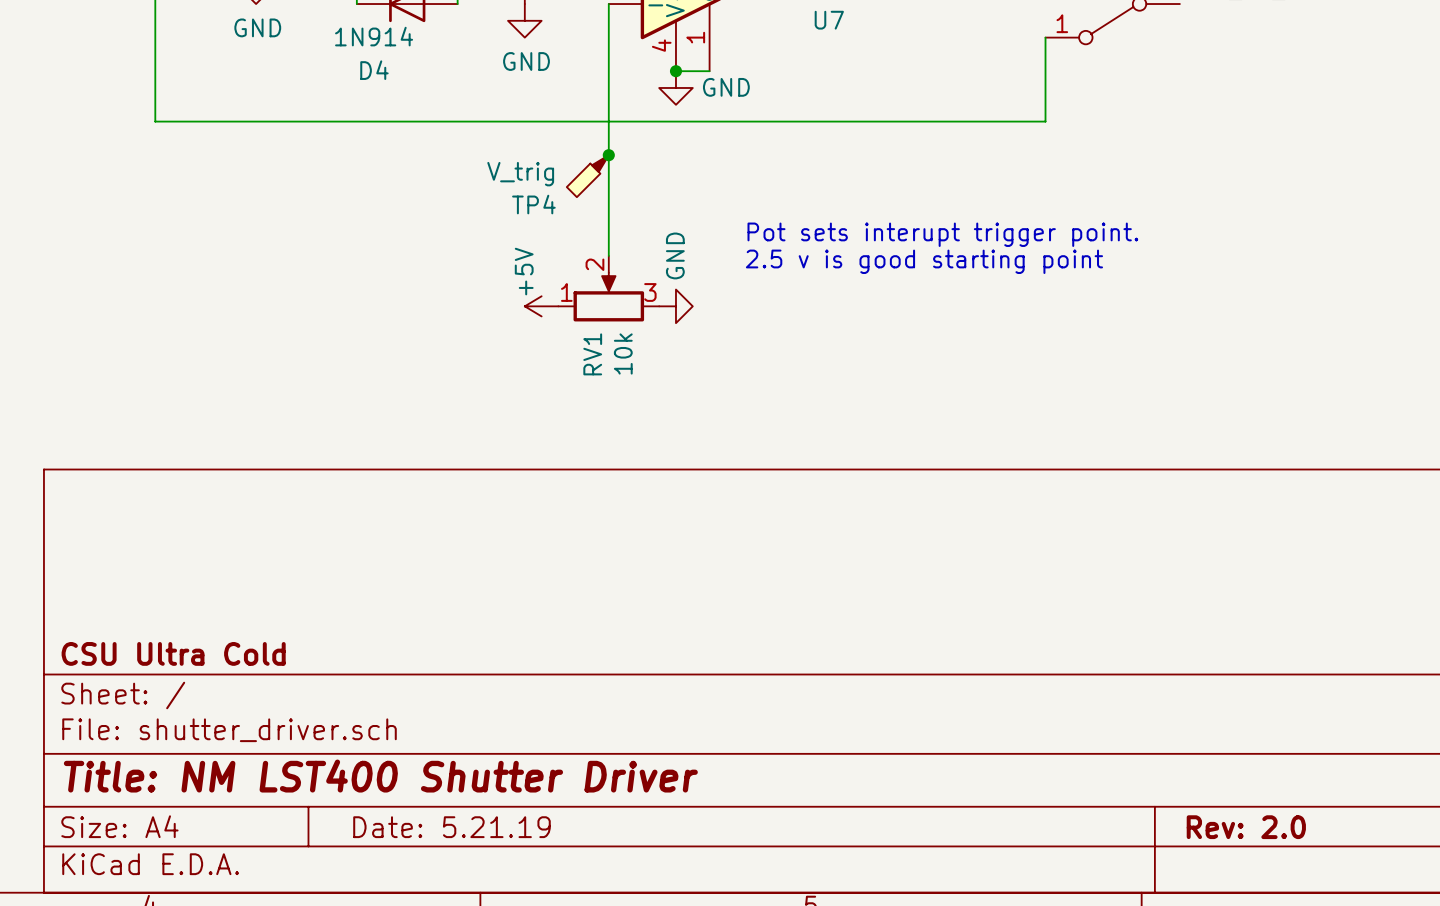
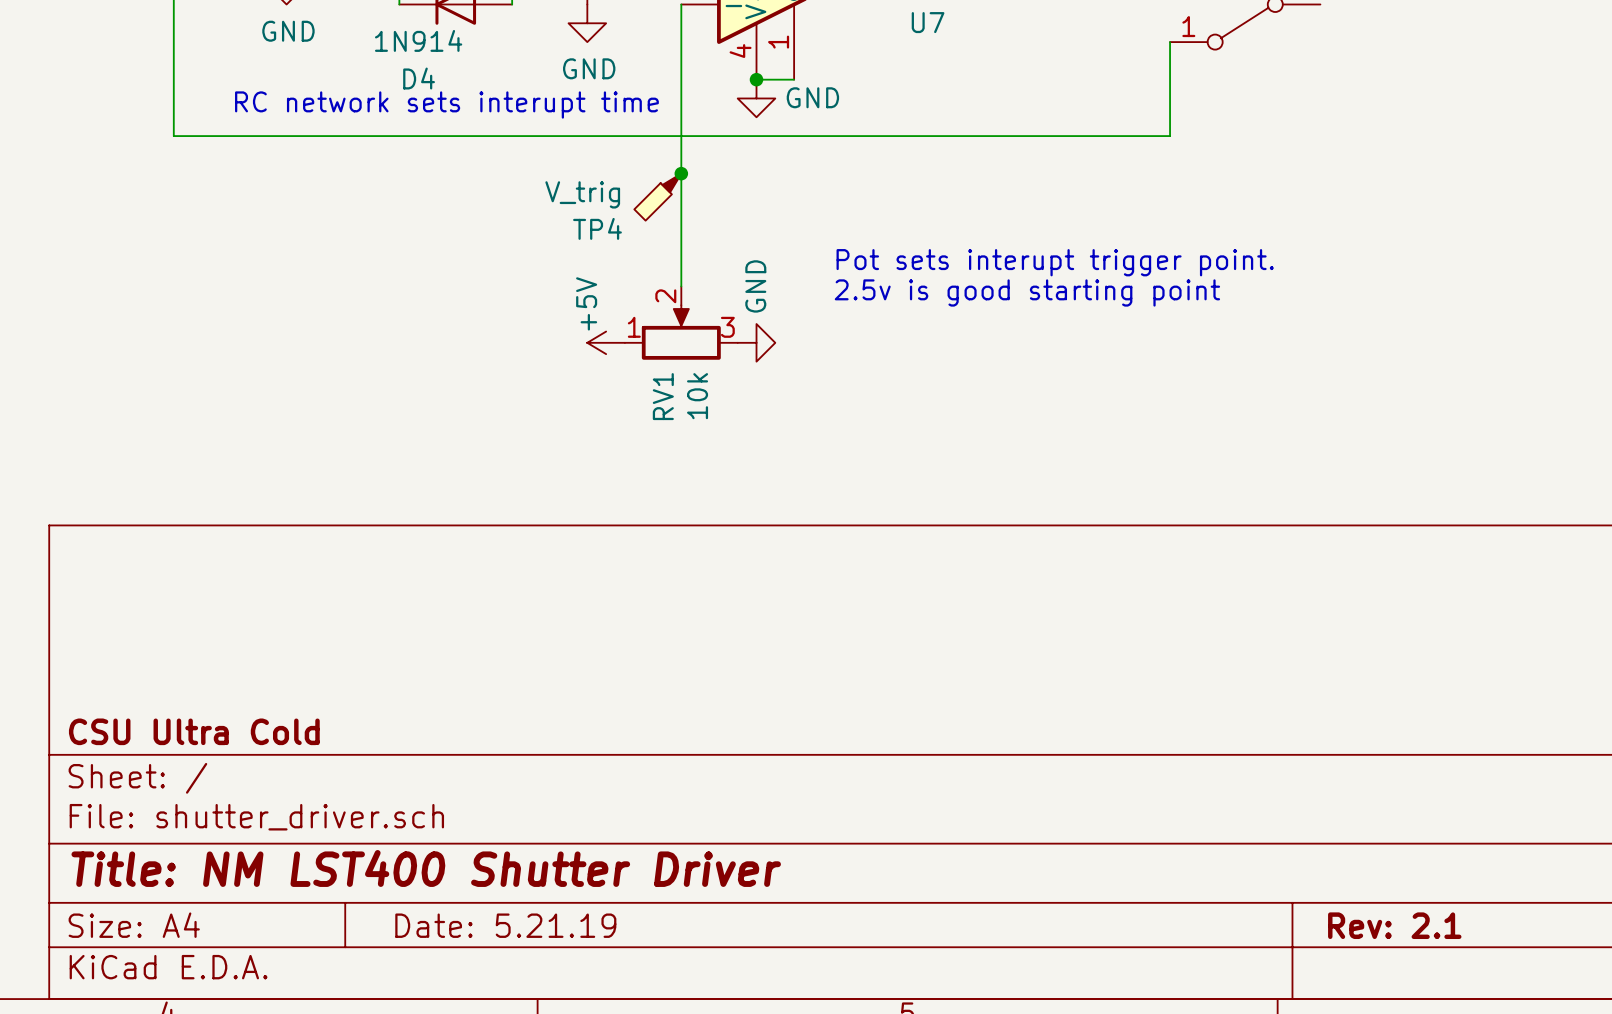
text: none -> RC network sets interupt time (446, 105)
text: 2.5 v is good starting point (924, 261) -> 2.5v is good starting point (1027, 292)
title block: Rev: 2.0 (1246, 827) -> Rev: 2.1 (1394, 925)

